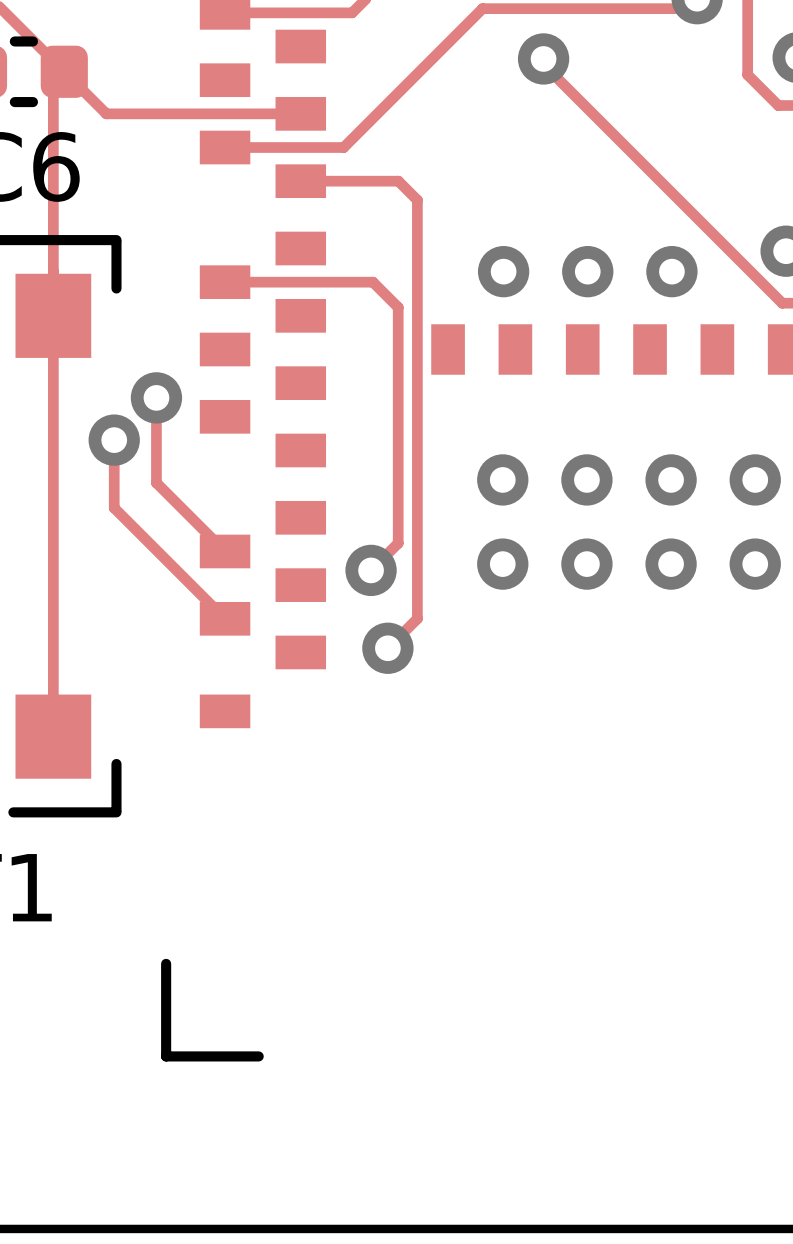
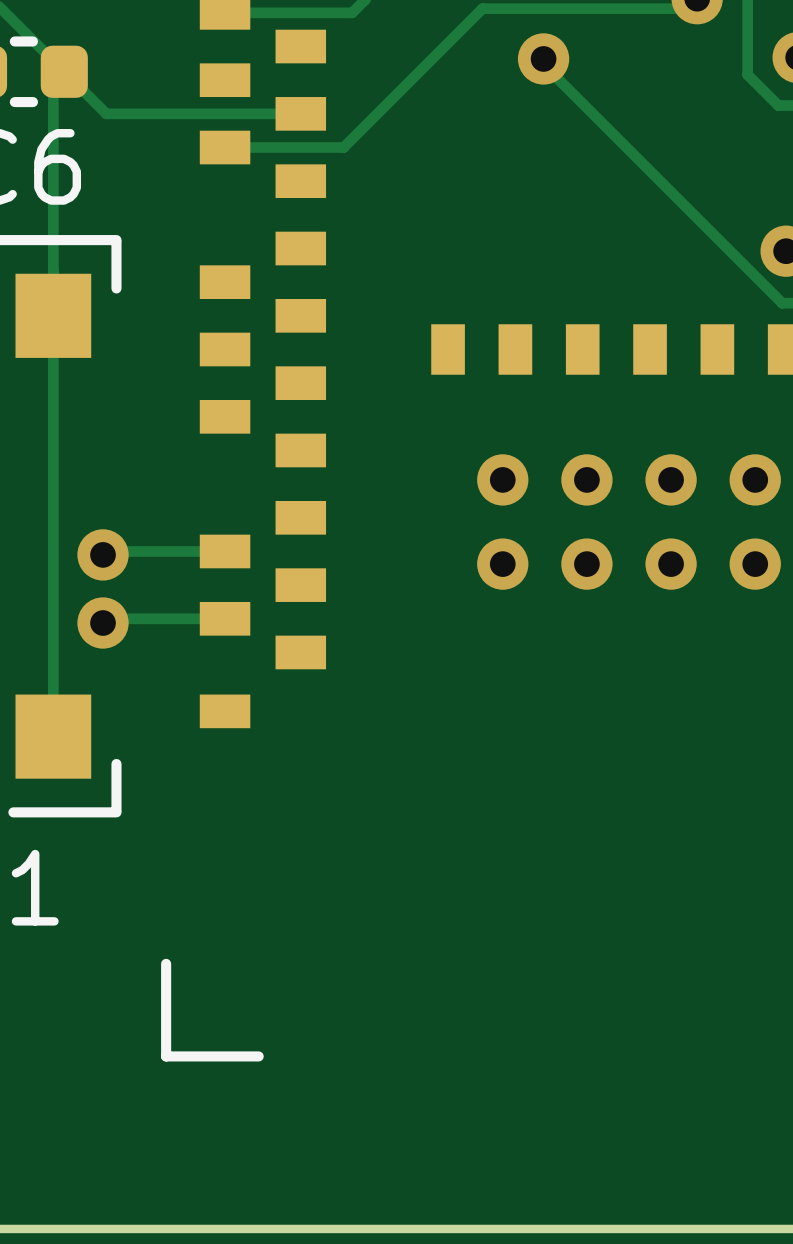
track: (300, 181) (398, 181) (417, 200) (417, 618) (387, 648) -> none
via: (503, 271) -> none
via: (587, 271) -> none
via: (671, 271) -> none
track: (225, 282) (372, 282) (398, 307) (398, 543) (371, 570) -> none
track: (156, 397) (156, 482) (225, 551) -> (103, 554) (106, 551) (225, 551)
via: (156, 397) -> none
track: (114, 440) (114, 507) (225, 618) -> (103, 623) (107, 618) (225, 618)
via: (114, 440) -> none
via: none -> (103, 554)
via: (371, 570) -> none
via: none -> (103, 623)
via: (387, 648) -> none

